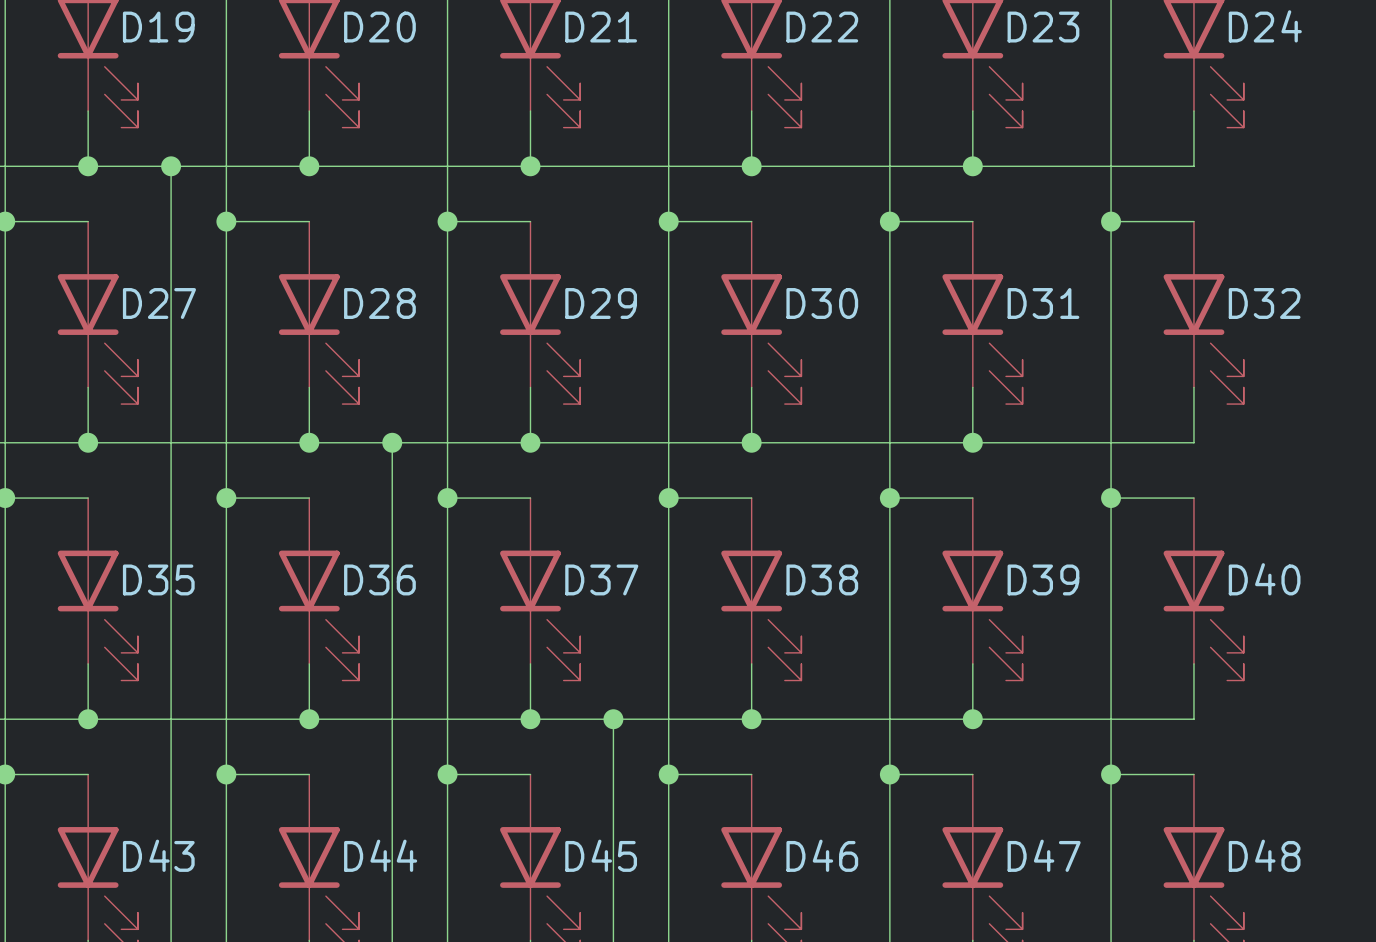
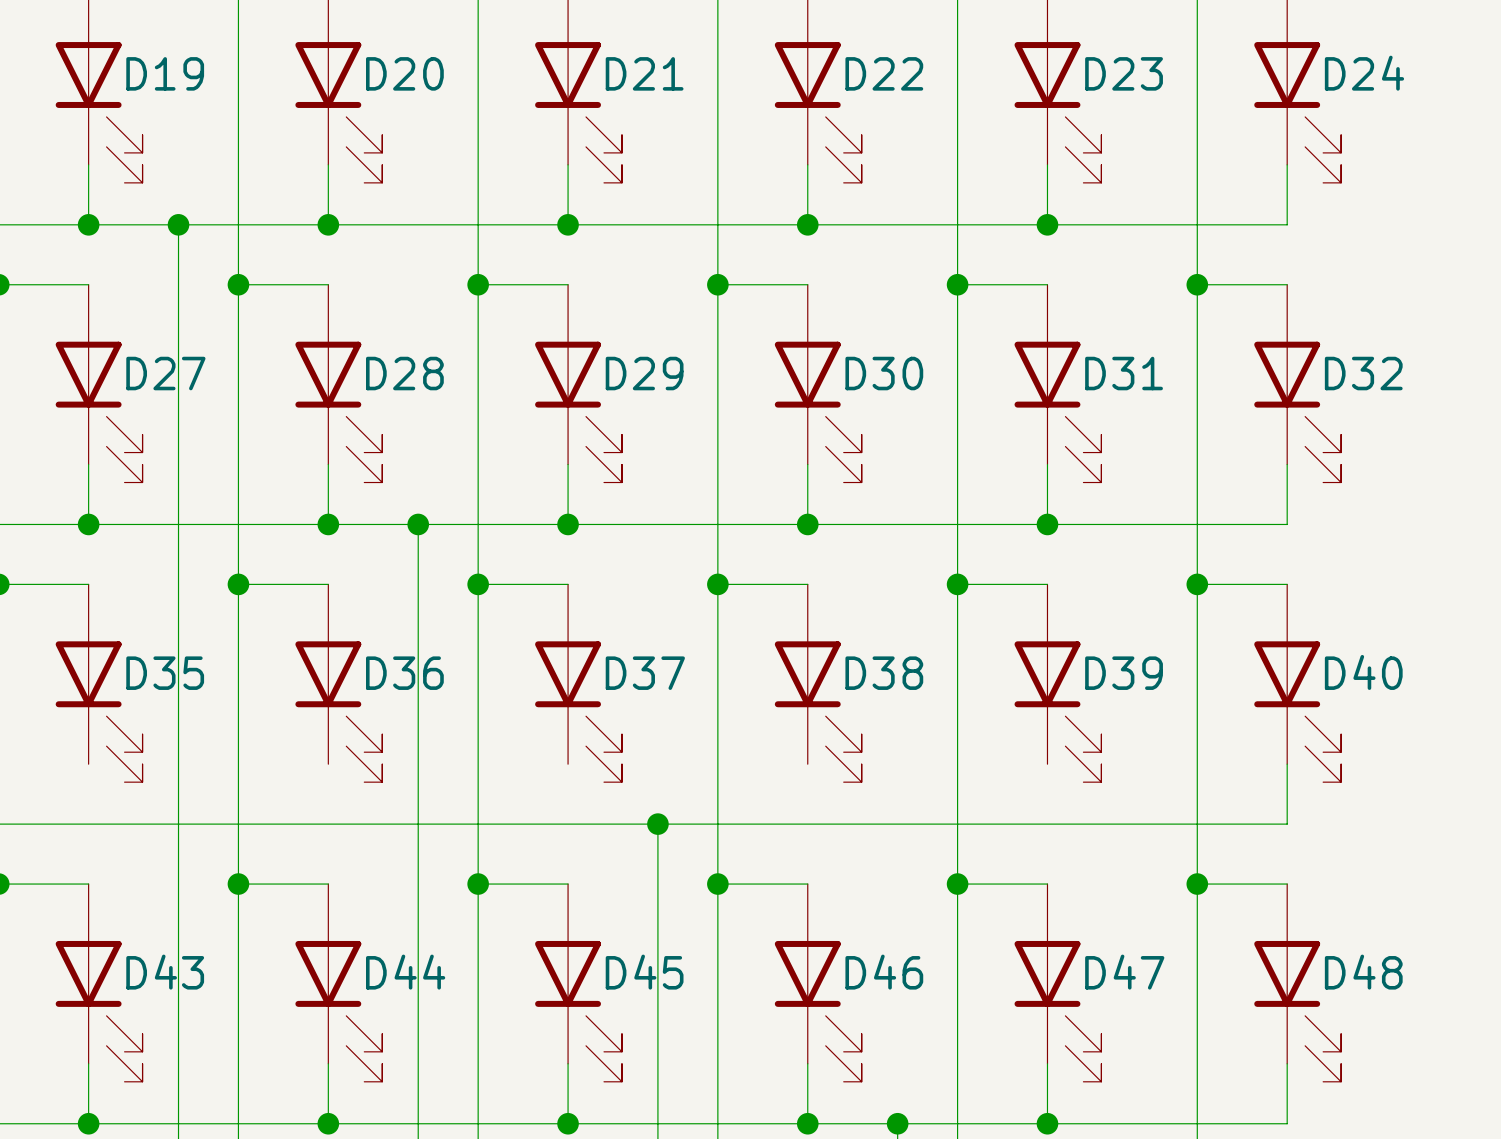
wire: (88, 663) (88, 719) -> none
wire: (309, 663) (309, 719) -> none
wire: (530, 663) (530, 719) -> none
wire: (751, 663) (751, 719) -> none
wire: (972, 663) (972, 719) -> none
junction: (88, 719) -> none
junction: (309, 719) -> none
junction: (530, 719) -> none
junction: (751, 719) -> none
junction: (972, 719) -> none

